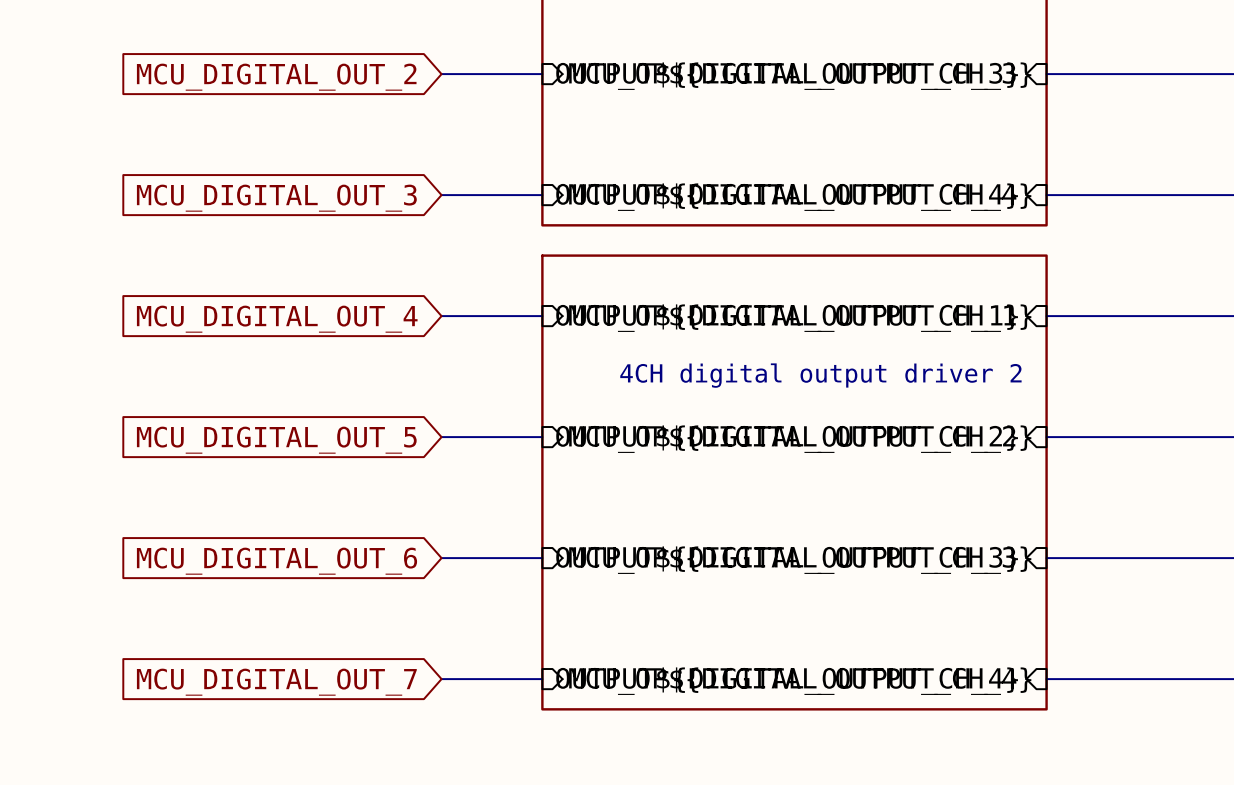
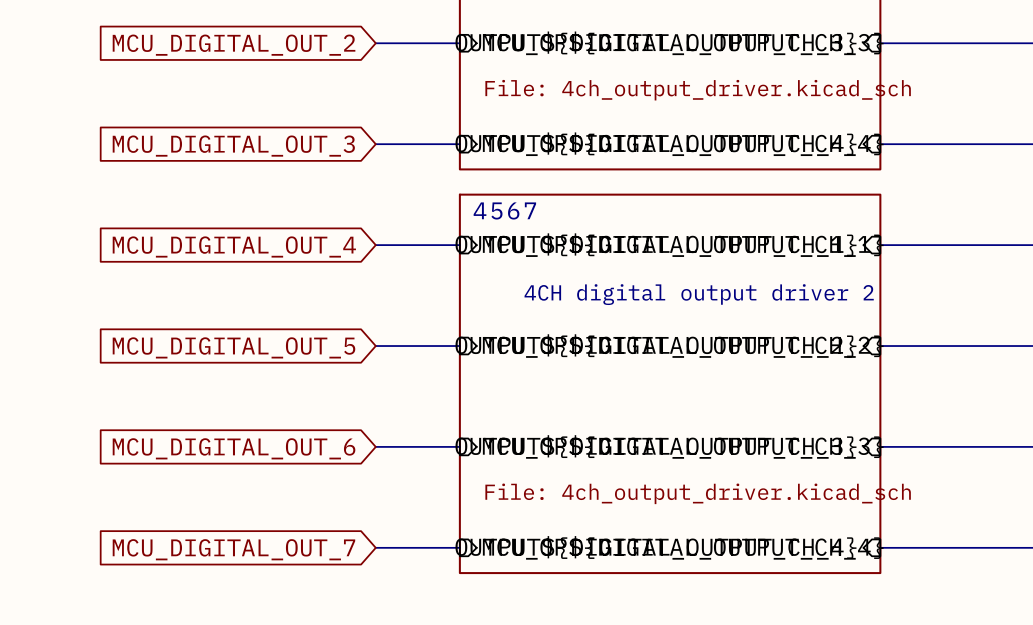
sheet value: none -> File: 4ch_output_driver.kicad_sch (698, 90)
sheet 4CH digital output driver 2 text: none -> 4 (480, 210)
sheet 4CH digital output driver 2 text: none -> 5 (496, 210)
sheet 4CH digital output driver 2 text: none -> 6 (513, 210)
sheet 4CH digital output driver 2 text: none -> 7 (530, 210)
sheet 4CH digital output driver 2 value: none -> File: 4ch_output_driver.kicad_sch (698, 493)

